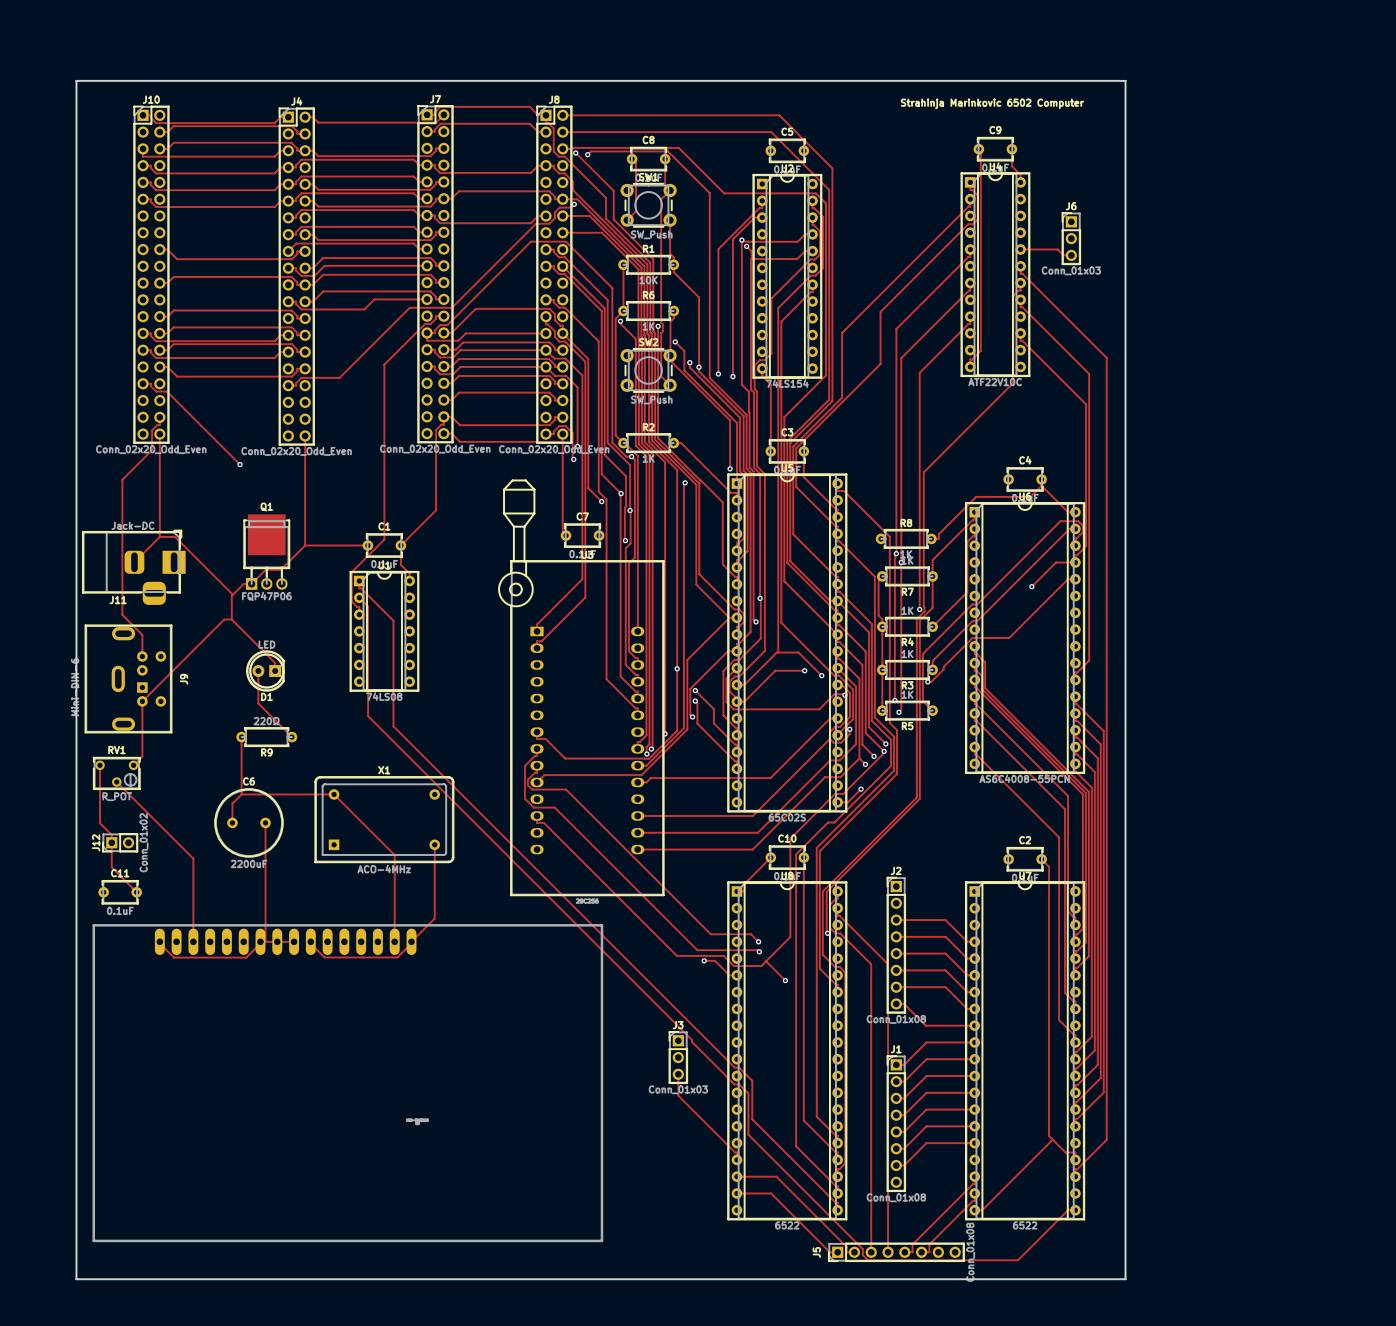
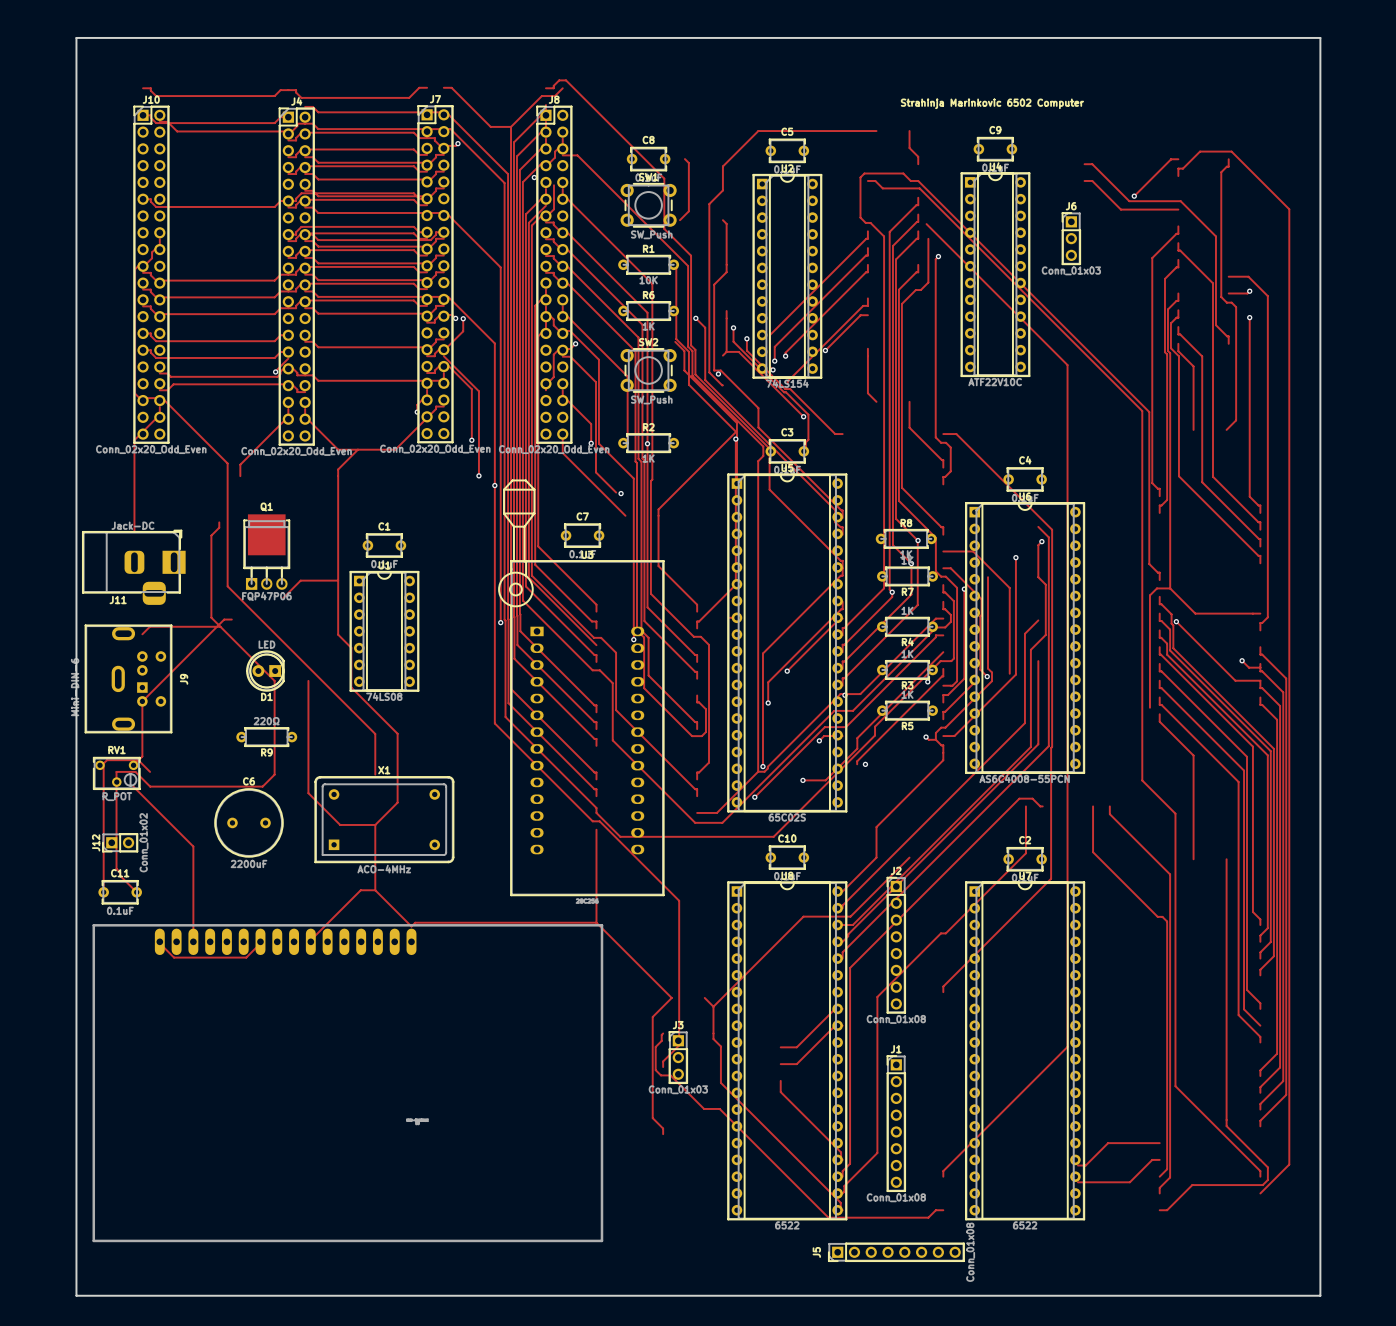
board edge: (76, 80) (1125, 80) (1125, 1279) (76, 1279) -> (76, 80) (76, 37) (1320, 37) (1320, 1295) (76, 1295) (76, 1279)
track: none -> (427, 87) (419, 87) (409, 97) (301, 97) (296, 90) (280, 90) (274, 96) (156, 96) (150, 88) (143, 88)
track: none -> (443, 87) (451, 87) (490, 126) (511, 126)
track: none -> (545, 88) (553, 88) (559, 80) (566, 80) (664, 178) (664, 228) (691, 255) (691, 345) (695, 349) (695, 374) (769, 448) (769, 489) (842, 560) (842, 575) (762, 653) (762, 766)
track: none -> (562, 88) (554, 96) (541, 96) (511, 126)
track: none -> (545, 105) (545, 112) (543, 112) (513, 142) (514, 658) (596, 738) (596, 745)
track: none -> (305, 106) (312, 106) (318, 112) (446, 112) (508, 174) (508, 703) (596, 789) (596, 796)
track: (427, 114) (434, 114) (440, 106) (529, 106) (538, 115) (545, 115) (545, 121) -> none
track: (443, 114) (436, 122) (318, 122) (312, 117) (305, 117) -> none
track: (562, 115) (779, 115) (832, 168) (832, 401) (790, 443) (790, 561) (830, 601) (837, 601) (868, 632) (868, 727) (885, 743) -> none
track: none -> (159, 121) (167, 121) (177, 131) (292, 131) (297, 123) (312, 123) (318, 129) (450, 129) (504, 183) (505, 717) (596, 808) (596, 812) (620, 836) (773, 836) (875, 735) (875, 726) (940, 661) (951, 661) (953, 658) (953, 601) (943, 592) (943, 585)
track: (545, 123) (553, 128) (553, 151) (558, 156) (564, 156) (606, 197) (606, 218) (650, 262) (652, 440) (696, 484) (696, 584) (729, 617) (687, 660) (687, 729) (641, 775) (544, 775) (537, 782) -> (545, 123) (545, 129) (543, 129) (516, 156) (517, 645) (596, 722) (596, 729)
track: none -> (511, 126) (511, 689) (596, 772) (596, 779)
track: (427, 131) (434, 131) (440, 123) (529, 123) (538, 132) (545, 132) -> none
track: none -> (876, 131) (758, 131) (722, 166) (722, 190) (709, 204) (709, 372) (722, 385)
track: (159, 132) (167, 132) (173, 126) (292, 126) (297, 133) (305, 133) -> none
track: (562, 132) (771, 132) (829, 189) (829, 399) (787, 441) (787, 562) (834, 610) (837, 610) (837, 625) (865, 651) (865, 732) (884, 753) (843, 793) (835, 793) (790, 838) (790, 937) (761, 966) (733, 966) (723, 955) (676, 955) (543, 822) (537, 822) (537, 816) -> none
track: none -> (545, 138) (545, 146) (543, 146) (519, 169) (520, 631) (596, 705) (596, 712)
track: none -> (562, 138) (562, 146) (554, 151) (554, 157) (549, 163) (541, 163) (522, 182) (522, 600) (592, 670) (599, 670) (612, 683) (612, 740) (695, 822) (722, 822) (834, 710) (852, 710) (936, 627) (945, 627) (950, 621) (950, 615) (943, 609) (943, 601)
track: none -> (288, 140) (296, 140) (301, 132) (413, 132) (419, 138) (434, 138) (440, 145) (455, 145) (457, 143)
via: none -> (457, 143)
track: (143, 148) (143, 156) (274, 156) (280, 150) (288, 150) -> none
track: (443, 148) (436, 148) (430, 156) (318, 156) (312, 150) (297, 150) (291, 142) (173, 142) (167, 148) (159, 148) -> none
track: (562, 148) (678, 147) (724, 193) (815, 193) (825, 203) (825, 375) (784, 417) (784, 581) (837, 634) (837, 642) (862, 664) (862, 744) (874, 756) -> none
track: (978, 149) (980, 151) (980, 350) (970, 359) (970, 366) -> none
track: (1011, 149) (1011, 166) (1020, 174) (1020, 182) -> (909, 131) (909, 148) (918, 156) (918, 164)
track: (575, 152) (613, 190) (613, 219) (653, 259) (655, 439) (699, 483) (699, 574) (734, 609) (739, 609) (744, 614) (744, 621) (736, 627) (736, 634) -> none
via: (575, 152) -> none
track: none -> (427, 154) (419, 154) (413, 149) (301, 149) (296, 157) (288, 157)
track: none -> (443, 154) (436, 154) (430, 162) (318, 162) (312, 157) (305, 157)
track: (587, 154) (590, 151) (668, 151) (709, 193) (709, 378) (746, 414) (746, 468) (750, 472) (750, 632) (736, 643) (736, 651) (727, 651) (690, 688) (690, 714) (692, 716) -> none
via: (587, 154) -> none
track: none -> (562, 155) (577, 155) (688, 265) (688, 346) (692, 351) (692, 375) (763, 446) (763, 456) (758, 461) (758, 771)
track: (632, 159) (636, 163) (636, 211) (627, 220) -> (684, 159) (688, 163) (688, 211) (679, 220)
track: (665, 159) (665, 185) (670, 190) (661, 199) (661, 322) (662, 324) (661, 376) (670, 385) -> none
track: none -> (1178, 159) (1170, 159) (1134, 196)
track: none -> (1228, 159) (1228, 166) (1221, 172) (1221, 297) (1226, 302) (1231, 302) (1236, 307) (1236, 420) (1226, 429)
track: none -> (1084, 164) (1092, 164) (1129, 201) (1180, 201) (1215, 236) (1215, 325) (1228, 336) (1228, 343)
track: (143, 165) (150, 165) (156, 173) (274, 173) (280, 167) (296, 167) (301, 159) (413, 159) (419, 165) (434, 165) (440, 172) (530, 172) (538, 165) (553, 165) (559, 173) (564, 173) (573, 181) (573, 190) (647, 264) (649, 441) (677, 470) (677, 730) (648, 758) (565, 758) (545, 739) (537, 739) (537, 732) -> none
track: none -> (427, 171) (419, 171) (413, 166) (301, 166) (296, 174) (288, 174)
track: none -> (443, 171) (436, 171) (430, 179) (318, 179) (312, 174) (305, 174)
track: none -> (1178, 176) (1178, 168) (1183, 168) (1200, 151) (1231, 151) (1289, 209) (1289, 1164) (1260, 1193)
via: none -> (534, 177)
track: none -> (867, 180) (875, 180) (882, 188) (919, 188) (1142, 411) (1142, 780) (1175, 813) (1175, 1086) (1260, 1171) (1260, 1176)
track: none -> (1084, 180) (1092, 180) (1120, 209) (1178, 209)
track: (427, 181) (419, 181) (413, 176) (301, 176) (296, 184) (280, 184) (274, 190) (156, 190) (150, 182) (143, 182) -> (427, 272) (419, 272) (413, 266) (301, 266) (296, 274) (280, 274) (274, 280) (156, 280) (150, 272) (143, 272)
track: (443, 181) (436, 181) (430, 189) (318, 189) (312, 184) (305, 184) -> none
track: (970, 182) (970, 189) (977, 195) (977, 219) (972, 224) (968, 224) (880, 311) (880, 363) (796, 448) (796, 486) (837, 526) (837, 541) (874, 576) (874, 717) (893, 736) (893, 770) (816, 847) (816, 1116) (837, 1135) (837, 1143) -> none
track: none -> (554, 185) (554, 209) (549, 213) (543, 213) (531, 225) (531, 575) (594, 637) (601, 637) (616, 652) (616, 710) (697, 789) (697, 796)
track: none -> (443, 188) (436, 188) (430, 196) (318, 196) (312, 190) (305, 190)
track: none -> (545, 188) (545, 196) (543, 196) (525, 214) (525, 586) (596, 655) (596, 661)
track: none -> (562, 188) (562, 196) (565, 196) (652, 283) (650, 593) (693, 636) (700, 636) (709, 644) (709, 762) (697, 772) (697, 779)
via: none -> (1134, 196)
track: none -> (918, 197) (918, 205) (889, 231) (889, 589) (892, 592) (892, 597) (842, 644) (842, 652)
track: (970, 199) (970, 206) (842, 332) (842, 397) (793, 446) (793, 534) (837, 576) (837, 591) (871, 624) (871, 720) (891, 739) (891, 765) (834, 822) (827, 822) (796, 854) (796, 1146) (837, 1186) (837, 1193) -> none
track: (762, 200) (762, 208) (759, 208) (718, 249) (718, 374) -> none
track: (812, 200) (812, 208) (822, 216) (822, 268) (815, 275) (810, 275) (778, 308) (778, 652) -> none
track: (305, 201) (312, 201) (318, 206) (430, 206) (436, 198) (451, 198) (459, 191) (549, 191) (554, 199) (577, 199) (644, 266) (644, 441) (665, 462) (665, 733) -> none
track: (574, 204) (570, 207) (559, 207) (554, 212) (554, 218) (549, 223) (536, 223) (451, 307) (409, 307) (339, 377) (301, 377) (296, 385) (288, 385) -> none
via: (574, 204) -> none
track: none -> (427, 205) (419, 205) (413, 199) (301, 199) (296, 207) (288, 207)
track: none -> (545, 205) (528, 222) (528, 577) (596, 645)
track: none -> (305, 207) (312, 207) (318, 212) (446, 212) (500, 267) (500, 622)
track: none -> (918, 214) (918, 221) (892, 245) (892, 545) (911, 563) (911, 594) (842, 661) (842, 668)
track: (545, 216) (538, 216) (530, 223) (440, 223) (434, 215) (419, 215) (413, 210) (301, 210) (296, 217) (288, 217) -> none
track: (562, 216) (589, 216) (641, 267) (641, 443) (652, 453) (651, 749) -> none
track: (762, 217) (754, 217) (732, 239) (732, 376) -> none
track: (812, 217) (812, 225) (820, 231) (820, 254) (814, 259) (810, 259) (771, 298) (771, 353) (764, 360) (759, 360) (754, 365) (754, 389) (756, 391) (756, 466) (764, 474) (764, 650) (739, 676) (734, 676) (729, 681) (729, 691) (736, 698) (736, 701) (744, 701) (775, 670) (804, 670) -> none
track: (670, 220) (670, 253) (673, 257) (673, 272) (699, 297) (699, 371) (743, 416) (743, 470) (747, 474) (747, 551) (736, 560) (736, 567) -> none
track: none -> (722, 220) (726, 223) (726, 272) (714, 284) (714, 370) (720, 370) (758, 408) (758, 427) (842, 510) (842, 517)
track: none -> (545, 222) (553, 222) (559, 230) (565, 230) (647, 312) (647, 607) (697, 655) (697, 661)
track: none -> (926, 224) (1067, 365) (1067, 1046) (943, 1171) (943, 1176)
track: none -> (1178, 226) (1178, 233) (1152, 258) (1152, 483) (1159, 488) (1159, 496)
track: none -> (867, 231) (867, 238) (769, 335) (769, 366) (773, 369)
track: none -> (918, 231) (918, 238) (895, 259) (895, 518) (917, 540) (917, 605) (842, 678) (842, 685)
track: (562, 232) (601, 232) (638, 269) (638, 444) (649, 455) (649, 744) (646, 747) (646, 754) -> none
track: (812, 234) (805, 234) (797, 241) (741, 241) -> none
track: none -> (427, 238) (419, 238) (413, 233) (301, 233) (296, 241) (288, 241)
track: none -> (443, 238) (436, 238) (430, 246) (318, 246) (312, 241) (305, 241)
track: none -> (928, 238) (928, 282) (920, 290) (915, 290) (901, 303) (901, 487) (943, 527) (943, 534)
track: none -> (159, 239) (159, 247) (152, 252) (152, 258) (145, 264) (139, 264) (135, 269) (135, 393) (139, 398) (162, 398) (227, 463) (227, 586) (375, 733) (375, 774)
track: none -> (545, 239) (553, 239) (559, 247) (564, 247) (642, 324) (644, 621) (697, 671) (697, 678)
track: (741, 240) (741, 384) (748, 391) (749, 467) (753, 471) (753, 619) (756, 621) -> none
via: (741, 240) -> none
track: none -> (1178, 243) (1178, 250) (1213, 283) (1213, 476) (1260, 522) (1260, 529)
track: (746, 246) (751, 251) (751, 259) -> none
via: (746, 246) -> none
track: none -> (867, 248) (867, 255) (774, 346) (774, 361)
track: (159, 249) (167, 249) (177, 259) (292, 259) (297, 251) (305, 251) -> none
track: (427, 249) (419, 249) (413, 243) (296, 243) (288, 251) -> none
track: (545, 249) (553, 249) (559, 257) (564, 257) (607, 300) (607, 442) (630, 465) (630, 543) (625, 548) (625, 664) (637, 674) (637, 681) -> none
track: (970, 249) (970, 256) (896, 328) (894, 700) -> none
track: (1020, 249) (1057, 249) (1063, 255) (1071, 255) -> none
track: (812, 251) (805, 251) (797, 259) (751, 259) -> none
track: none -> (427, 255) (419, 255) (413, 250) (301, 250) (296, 257) (288, 257)
track: none -> (443, 255) (436, 255) (430, 263) (318, 263) (312, 257) (305, 257)
track: none -> (545, 256) (553, 256) (559, 263) (564, 263) (638, 337) (638, 458) (641, 461) (641, 630) (648, 637) (648, 675) (697, 722) (697, 729)
track: none -> (938, 256) (935, 259) (935, 437) (950, 447) (950, 471) (943, 476) (943, 484)
via: none -> (938, 256)
track: (751, 259) (751, 389) (754, 392) (754, 467) (760, 473) (760, 638) (739, 659) (734, 659) (723, 671) (723, 715) (736, 727) (736, 735) -> none
track: none -> (1178, 259) (1178, 267) (1164, 278) (1167, 499) (1159, 505) (1159, 512)
track: (623, 264) (623, 311) (615, 318) (615, 435) (637, 456) (637, 631) -> none
track: none -> (676, 264) (676, 339) (688, 351) (688, 384) (736, 431) (685, 482)
track: none -> (867, 264) (867, 272) (785, 352) (785, 356)
track: none -> (918, 264) (918, 272) (898, 289) (898, 500) (935, 537) (935, 571) (941, 576) (945, 576) (957, 587) (957, 681) (952, 685) (943, 685)
track: (427, 265) (324, 265) (314, 275) (301, 275) (296, 268) (288, 268) -> none
track: (443, 265) (436, 265) (430, 258) (323, 258) (312, 268) (305, 268) -> none
track: (545, 266) (553, 266) (559, 274) (564, 274) (601, 311) (601, 474) (621, 493) (620, 676) (637, 691) (637, 698) -> none
track: (562, 266) (604, 308) (604, 454) (626, 476) (625, 540) -> none
track: (1020, 266) (1020, 273) (1106, 357) (1106, 1139) (1075, 1169) (1075, 1176) -> none
track: none -> (443, 272) (436, 272) (430, 280) (318, 280) (312, 274) (305, 274)
track: none -> (545, 272) (553, 272) (559, 280) (564, 280) (635, 351) (637, 630) (644, 637) (644, 688) (692, 736) (701, 736) (705, 732) (705, 709) (697, 702) (697, 695)
track: none -> (1228, 276) (1248, 276) (1267, 296) (1267, 617) (1260, 622) (1260, 630)
track: (443, 282) (436, 282) (430, 274) (323, 274) (312, 284) (297, 284) (291, 276) (173, 276) (167, 283) (159, 283) -> none
track: (970, 283) (970, 290) (901, 358) (901, 709) (898, 712) -> none
track: (1020, 283) (1020, 290) (1013, 296) (1013, 383) (923, 472) (924, 611) (916, 619) (916, 797) (822, 891) (822, 954) (834, 966) (839, 966) (845, 972) (845, 1163) (837, 1169) (837, 1176) -> none
track: (812, 284) (812, 292) (781, 321) (781, 622) (834, 675) (838, 675) (853, 689) (853, 719) (837, 735) -> none
track: none -> (427, 289) (419, 289) (413, 283) (301, 283) (296, 291) (280, 291) (274, 297) (156, 297) (150, 289) (143, 289)
track: none -> (545, 289) (545, 297) (535, 305) (535, 564) (591, 621) (596, 621) (596, 628)
track: none -> (305, 291) (312, 291) (318, 296) (448, 296) (494, 343) (494, 723) (592, 821) (599, 821) (679, 900) (679, 1045) (663, 1061) (663, 1067)
track: none -> (1249, 291) (1247, 293) (1228, 293)
via: none -> (1249, 291)
track: none -> (1178, 293) (1178, 300) (1167, 309) (1167, 350) (1170, 353) (1170, 588)
track: none -> (867, 298) (867, 305) (863, 305) (787, 381) (787, 384)
track: (427, 299) (374, 299) (364, 309) (301, 309) (296, 301) (288, 301) -> none
track: (443, 299) (436, 299) (430, 291) (323, 291) (312, 301) (305, 301) -> none
track: (545, 299) (553, 299) (559, 307) (564, 307) (598, 341) (598, 491) (606, 499) (606, 679) (637, 708) (637, 715) -> none
track: (1020, 299) (1020, 307) (1089, 373) (1089, 660) (1075, 672) (1075, 679) -> none
track: none -> (427, 305) (419, 305) (413, 300) (301, 300) (296, 308) (280, 308) (274, 314) (156, 314) (150, 306) (143, 306)
track: none -> (443, 305) (436, 305) (430, 313) (318, 313) (312, 308) (305, 308)
track: none -> (545, 306) (545, 314) (553, 319) (553, 325) (559, 330) (570, 330) (598, 359) (598, 443) (633, 478) (633, 639)
track: none -> (562, 306) (562, 314) (565, 314) (627, 376) (627, 443)
track: none -> (1178, 310) (1178, 317) (1170, 323) (1170, 348) (1178, 356) (1178, 476) (1260, 555) (1260, 563)
track: (673, 311) (673, 318) (670, 321) (670, 360) (730, 420) (730, 468) -> none
track: none -> (726, 311) (726, 351)
track: none -> (867, 315) (860, 315) (825, 350)
track: (159, 316) (167, 316) (173, 310) (291, 310) (297, 318) (305, 318) -> none
track: (443, 316) (436, 316) (430, 323) (425, 323) (384, 364) (384, 539) (351, 572) (351, 601) (359, 607) (359, 614) -> none
track: (970, 316) (970, 324) (919, 372) (919, 609) -> none
track: none -> (1249, 317) (1249, 496) (1260, 505) (1260, 512)
via: none -> (1249, 317)
track: none -> (455, 318) (452, 314) (440, 314) (434, 322) (427, 322)
via: none -> (455, 318)
track: none -> (463, 318) (463, 331) (446, 348) (440, 348) (434, 356) (427, 356)
via: none -> (463, 318)
track: none -> (695, 318) (705, 327) (705, 380) (835, 510) (835, 522) (842, 527) (842, 534)
via: none -> (695, 318)
track: (620, 321) (620, 323) (635, 339) (635, 445) (646, 456) (646, 735) (637, 741) (637, 748) -> none
via: (620, 321) -> none
track: (545, 324) (554, 331) (554, 337) (559, 341) (565, 341) (585, 361) (585, 597) (541, 641) (537, 641) (537, 648) -> (545, 324) (545, 330) (538, 336) (538, 546) (596, 604) (596, 611)
track: (658, 326) (658, 438) (722, 502) (722, 564) (736, 576) (736, 584) -> none
via: (658, 326) -> none
track: none -> (733, 327) (733, 341) (808, 414) (808, 439) (805, 442) (805, 449)
via: none -> (733, 327)
track: none -> (1178, 327) (1178, 334) (1202, 356) (1202, 482) (1260, 539) (1260, 546)
track: (443, 332) (451, 332) (475, 308) (549, 308) (554, 314) (554, 320) (562, 325) (562, 333) (588, 359) (588, 488) (601, 501) -> none
track: (159, 333) (167, 333) (173, 327) (291, 327) (297, 335) (305, 335) -> none
track: (545, 333) (465, 333) (458, 340) (427, 339) (427, 332) (434, 332) (440, 325) (447, 325) (530, 241) (565, 241) (612, 288) (612, 442) (626, 456) (631, 456) (634, 459) (634, 557) (628, 563) (628, 651) (637, 658) (637, 665) -> none
track: (1020, 333) (1020, 340) (1086, 404) (1086, 546) (1075, 555) (1075, 562) (1056, 562) (1031, 586) -> none
track: none -> (746, 338) (746, 350) (785, 389) (790, 389) (835, 434) (842, 434)
via: none -> (746, 338)
track: none -> (443, 339) (436, 339) (430, 347) (318, 347) (312, 341) (305, 341)
via: (675, 341) -> none
track: none -> (575, 343) (570, 348) (559, 348) (553, 354) (553, 377) (545, 382) (545, 390)
via: none -> (575, 343)
track: none -> (1178, 343) (1178, 351) (1193, 366) (1193, 429)
track: none -> (867, 348) (867, 393) (876, 401)
track: (427, 349) (434, 349) (440, 357) (453, 357) (460, 350) (545, 350) (554, 358) (565, 358) (582, 375) (582, 579) (537, 624) (537, 631) -> none
track: (443, 349) (455, 349) (463, 342) (549, 342) (554, 350) (562, 350) -> none
track: (159, 350) (167, 350) (173, 344) (291, 344) (297, 352) (305, 352) -> none
via: none -> (825, 350)
track: none -> (726, 351) (722, 355)
track: none -> (726, 351) (738, 351) (803, 416)
track: none -> (443, 356) (478, 391) (478, 475)
track: none -> (562, 356) (570, 356) (595, 382) (595, 472) (616, 492)
via: none -> (785, 356)
track: none -> (288, 358) (275, 371)
via: none -> (774, 361)
track: (689, 362) (689, 367) (739, 417) (739, 471) (744, 475) (744, 537) (736, 543) (736, 550) -> none
via: (689, 362) -> none
track: (427, 366) (434, 366) (440, 374) (453, 374) (460, 367) (545, 367) (554, 376) (566, 376) (577, 387) (577, 446) -> none
track: (443, 366) (451, 366) (459, 359) (549, 359) (554, 367) (562, 367) -> none
track: (159, 367) (167, 367) (177, 376) (292, 376) (297, 368) (305, 368) -> none
via: (699, 367) -> none
track: (762, 368) (762, 376) (770, 384) (770, 451) -> none
via: none -> (773, 369)
via: none -> (275, 371)
track: none -> (427, 373) (434, 373) (440, 364) (447, 364) (471, 389) (471, 440)
track: none -> (443, 373) (443, 380) (318, 380) (312, 375) (297, 375) (291, 367) (284, 367) (277, 376) (170, 376) (167, 373) (159, 373)
via: (732, 376) -> none
track: (143, 383) (150, 383) (156, 391) (166, 391) (240, 464) -> none
track: (443, 383) (451, 383) (458, 376) (549, 376) (554, 383) (562, 383) -> none
track: none -> (427, 389) (427, 397) (417, 404) (417, 412)
track: none -> (159, 390) (167, 390) (173, 384) (292, 384) (297, 392) (305, 392)
track: none -> (562, 390) (562, 398) (565, 398) (591, 424) (591, 443)
track: (443, 400) (451, 400) (459, 392) (549, 392) (554, 400) (562, 400) -> none
track: none -> (443, 406) (436, 406) (436, 408) (395, 449) (338, 449) (305, 416) (305, 408)
track: none -> (159, 407) (159, 414) (134, 440) (134, 531)
track: none -> (288, 408) (288, 416) (240, 464) (240, 476)
via: none -> (417, 412)
via: none -> (803, 416)
track: (159, 417) (159, 425) (152, 430) (152, 450) (122, 479) (122, 614) (142, 634) (142, 656) -> none
track: (562, 417) (554, 417) (549, 425) (459, 425) (451, 416) (443, 416) (443, 424) (436, 429) (436, 510) (400, 545) (400, 564) (409, 573) (409, 581) -> none
track: (443, 433) (451, 433) (459, 441) (562, 441) -> none
track: (159, 434) (159, 536) -> none
track: (545, 434) (553, 434) (559, 426) (565, 426) (572, 433) (573, 459) -> none
track: none -> (943, 434) (956, 434) (1052, 529) (1051, 878) (943, 986) (943, 992)
track: (305, 435) (305, 545) -> none
track: none -> (735, 439) (735, 584) (697, 621) (697, 628)
via: none -> (471, 440)
via: none -> (591, 443)
track: (673, 443) (681, 443) (731, 492) (736, 492) (736, 500) -> none
via: (577, 446) -> none
track: none -> (357, 449) (338, 469) (338, 634) (351, 647) (351, 687) (397, 733) (397, 802) (375, 824)
track: (803, 451) (803, 477) (837, 509) (837, 517) -> (909, 401) (909, 427) (943, 460) (943, 467)
track: (562, 453) (562, 532) (566, 535) -> (562, 453) (625, 515)
via position: (631, 456) -> (647, 443)
via: (573, 459) -> none
via: (240, 464) -> none
via position: (730, 468) -> (735, 439)
via: none -> (478, 475)
via: (685, 482) -> none
track: (837, 483) (837, 491) (844, 491) (889, 536) (889, 722) (896, 730) (896, 774) (819, 851) (819, 968) (837, 984) (837, 992) -> none
track: (683, 484) (683, 728) (646, 765) (637, 765) -> (683, 484) (658, 509) (658, 566) (697, 604) (697, 611)
via: none -> (494, 485)
track: (1041, 485) (1030, 496) (976, 496) (938, 534) (938, 538) (931, 538) -> none
track: (1041, 485) (1067, 512) (1075, 512) -> none
via: (601, 501) -> none
via: (630, 510) -> none
track: (974, 512) (974, 519) (932, 560) (932, 607) (919, 620) (919, 798) (826, 891) (827, 933) -> none
track: none -> (1038, 526) (1048, 537) (1048, 746) (842, 952) (842, 958)
track: (974, 528) (974, 536) (967, 541) (967, 592) (932, 626) -> none
track: (1075, 528) (1067, 528) (977, 621) (972, 621) (932, 660) (932, 669) -> none
track: (159, 536) (175, 536) (232, 594) -> none
track: (159, 536) (134, 562) -> none
via: (625, 540) -> none
via: none -> (918, 540)
track: none -> (1041, 541) (1038, 545) (1038, 577) (1045, 584) (1045, 634) (1030, 649) (1030, 746) (852, 925) (842, 925)
via: none -> (1041, 541)
track: (305, 545) (367, 545) -> none
track: (305, 545) (280, 569) (265, 569) (251, 583) (243, 583) (231, 595) (231, 619) (275, 662) (275, 671) -> none
track: (1075, 545) (1075, 538) (1083, 532) (1083, 525) (1078, 521) (1060, 521) (977, 604) (972, 604) (922, 653) (922, 700) (932, 710) -> none
track: none -> (943, 551) (973, 551) (1009, 588) (1009, 673)
via: (896, 553) -> none
track: none -> (1015, 557) (1015, 674) (954, 736) (943, 736)
via: none -> (1015, 557)
via: (901, 562) -> none
via: none -> (911, 563)
track: none -> (943, 568) (950, 568) (981, 599) (980, 669) (987, 676)
track: (882, 576) (878, 576) (878, 615) (882, 619) (882, 710) -> none
track: none -> (988, 577) (988, 668) (992, 672) (992, 681) (945, 727) (941, 727) (935, 732) (935, 739)
track: (1075, 579) (1067, 579) (1009, 637) (972, 637) (931, 681) (927, 681) -> none
track: none -> (338, 580) (300, 580) (283, 597)
track: none -> (1159, 580) (1159, 572) (1149, 564) (1149, 412) (918, 180) (910, 180) (903, 173) (864, 173) (860, 177) (860, 217) (865, 222) (870, 222) (884, 236) (884, 588) (842, 627) (842, 635)
track: (359, 581) (359, 588) (393, 620) (393, 726) (734, 1067) (739, 1067) (752, 1080) (752, 1119) (837, 1202) (837, 1210) -> none
via: (1031, 586) -> none
track: none -> (1170, 588) (1195, 613) (1260, 613)
track: none -> (1170, 588) (1156, 588) (1149, 595) (1149, 707)
track: none -> (964, 589) (964, 678) (947, 695) (943, 695) (943, 702)
via: none -> (964, 589)
via: none -> (892, 592)
track: none -> (1159, 596) (1159, 604) (1171, 614) (1173, 648) (1273, 748) (1273, 956) (1260, 969) (1260, 975)
track: (359, 597) (368, 606) (368, 716) (734, 1084) (739, 1084) (748, 1093) (748, 1134) (862, 1249) (862, 1255) (867, 1260) (1017, 1260) (1067, 1210) (1075, 1210) -> none
via: (760, 598) -> none
track: none -> (842, 601) (842, 609) (768, 682) (768, 703)
via: (919, 609) -> none
track: none -> (976, 613) (976, 680) (943, 711) (943, 719)
track: none -> (1159, 613) (1159, 621) (1170, 629) (1170, 650) (1270, 751) (1270, 942) (1260, 952) (1260, 958)
track: none -> (842, 618) (839, 618) (787, 671)
track: none -> (943, 618) (935, 618) (860, 694) (840, 694) (764, 771) (758, 771)
track: none -> (1038, 620) (1024, 633) (1024, 723) (842, 905) (842, 908)
via: (756, 621) -> none
track: none -> (1176, 621) (1235, 680) (1260, 680) (1260, 688) (1280, 705) (1280, 1067) (1260, 1087) (1260, 1092)
via: none -> (1176, 621)
via: none -> (500, 622)
track: none -> (220, 626) (149, 626) (142, 634)
track: none -> (1159, 630) (1159, 637) (1167, 643) (1167, 654) (1267, 755) (1267, 928) (1260, 935) (1260, 941)
track: none -> (943, 635) (935, 635) (845, 727) (824, 727) (754, 797)
via: none -> (633, 639)
track: (974, 646) (974, 653) (985, 662) (985, 688) (1088, 791) (1088, 956) (1075, 967) (1075, 975) -> none
track: none -> (1159, 647) (1159, 654) (1252, 746) (1252, 912) (1260, 919) (1260, 925)
track: none -> (1260, 647) (1260, 654) (1286, 678) (1286, 1094) (1260, 1120) (1260, 1126)
track: (837, 651) (837, 658) (859, 678) (859, 758) -> none
track: none -> (943, 652) (857, 738) (857, 748) (825, 780) (802, 780)
track: none -> (1242, 660) (1248, 667) (1260, 667)
via: none -> (1242, 660)
track: none -> (1038, 661) (1038, 744) (842, 941)
track: (974, 663) (974, 670) (982, 676) (982, 689) (1085, 793) (1085, 942) (1075, 951) (1075, 958) -> none
track: none -> (1159, 663) (1159, 671) (1246, 756) (1246, 989) (1260, 1003) (1260, 1008)
track: none -> (1260, 663) (1260, 671) (1283, 692) (1283, 1081) (1260, 1104) (1260, 1109)
via: (677, 668) -> none
track: (736, 668) (726, 678) (726, 702) (733, 709) (819, 709) (834, 694) (844, 695) -> none
track: (837, 668) (856, 686) (856, 744) (839, 760) (830, 760) (757, 832) (637, 832) -> none
track: none -> (943, 668) (943, 676) (857, 761) (857, 764)
via: (804, 670) -> none
track: (258, 671) (258, 703) (291, 737) -> none
via: none -> (787, 671)
track: (821, 675) (798, 652) (776, 652) (744, 684) (736, 684) -> none
via: (821, 675) -> none
via: none -> (987, 676)
track: (974, 679) (974, 687) (1082, 794) (1082, 928) (1075, 934) (1075, 941) -> none
track: none -> (308, 680) (308, 793) (340, 824) (375, 824)
track: none -> (1159, 680) (1159, 688) (1244, 770) (1244, 1009) (1260, 1025)
track: (837, 684) (841, 684) (849, 692) (849, 716) (840, 726) (835, 726) (829, 732) (829, 739) -> none
track: (695, 690) (713, 709) (713, 723) (736, 744) (736, 752) -> none
via: (695, 690) -> none
track: (974, 696) (974, 704) (1067, 796) (1067, 911) (1075, 917) (1075, 925) -> none
track: (1075, 696) (1075, 704) (1103, 731) (1103, 1092) (1075, 1118) (1075, 1126) -> none
track: none -> (1159, 697) (1159, 704) (1238, 781) (1238, 1015) (1260, 1036) (1260, 1042)
track: none -> (1260, 697) (1260, 704) (1277, 719) (1277, 1053) (1260, 1070) (1260, 1076)
via: (894, 700) -> none
track: (695, 701) (697, 703) (697, 723) (736, 761) (736, 768) -> none
via: (695, 701) -> none
via: none -> (768, 703)
via: (898, 712) -> none
track: (974, 713) (974, 720) (1065, 809) (1065, 992) (1075, 1001) (1075, 1008) -> none
track: (1075, 713) (1075, 720) (1100, 744) (1100, 1078) (1075, 1102) (1075, 1109) -> none
track: none -> (1159, 714) (1159, 721) (1193, 755) (1193, 859)
via: (692, 716) -> none
track: (837, 718) (830, 718) (770, 778) (650, 778) (646, 782) (637, 782) -> none
track: (849, 729) (849, 734) (841, 742) (833, 742) (829, 739) -> none
via: (849, 729) -> none
track: (1075, 730) (1075, 737) (1097, 758) (1097, 1064) (1075, 1085) (1075, 1092) -> none
via: (665, 733) -> none
track: none -> (842, 736) (824, 736) (819, 740)
track: (241, 737) (241, 794) -> none
track: none -> (926, 737) (928, 739) (935, 739)
via: none -> (926, 737)
track: (829, 739) (752, 816) (637, 816) -> none
track: none -> (935, 739) (943, 745) (943, 760) (876, 827) (876, 857) (842, 891)
via: none -> (819, 740)
via: (885, 743) -> none
track: (974, 747) (974, 754) (1059, 837) (1059, 1020) (1075, 1035) (1075, 1042) -> none
track: (1075, 747) (1075, 754) (1094, 772) (1094, 1050) (1075, 1068) (1075, 1076) -> none
track: (537, 748) (537, 755) (524, 765) (524, 798) (533, 807) (554, 807) (697, 950) (757, 950) (759, 951) -> none
via: (651, 749) -> none
via: (884, 751) -> none
via: (646, 754) -> none
via: (874, 756) -> none
track: (859, 758) (840, 777) (825, 777) (752, 849) (637, 849) -> none
track: (859, 758) (865, 764) -> none
track: (1075, 763) (1075, 771) (1091, 787) (1091, 1036) (1075, 1051) (1075, 1059) -> none
track: (100, 765) (100, 823) (111, 834) (111, 867) (120, 875) -> (219, 522) (219, 527) (211, 535) (211, 617) (274, 680) (274, 774) (262, 786) (150, 786) (135, 771) (116, 771) (116, 868) (120, 872) (120, 875)
track: (537, 765) (537, 772) (527, 779) (527, 785) (532, 789) (566, 789) (710, 934) (751, 934) (758, 941) -> none
via: none -> (762, 766)
track: none -> (150, 771) (138, 760) (106, 760) (103, 763) (103, 892)
track: none -> (758, 771) (716, 812) (697, 812)
via: none -> (802, 780)
track: (116, 782) (193, 858) -> (133, 786) (193, 846) (193, 858)
track: (861, 789) (847, 802) (837, 802) -> none
via: (861, 789) -> none
track: (241, 794) (232, 803) (232, 822) -> none
track: (241, 794) (334, 794) (394, 855) (394, 941) -> none
via: none -> (754, 797)
track: none -> (1025, 806) (1025, 853) (945, 933) (940, 933) (877, 996) (877, 1153) (844, 1186) (842, 1193)
track: none -> (1042, 806) (1032, 798) (1019, 798) (850, 967) (850, 1163) (842, 1171) (842, 1176)
track: none -> (1093, 806) (1093, 852) (1157, 916) (1162, 916) (1167, 921) (1167, 1169) (1159, 1176)
track: none -> (1109, 806) (1109, 814) (1170, 874) (1170, 1177) (1159, 1187) (1159, 1193)
track: (265, 822) (265, 941) -> none
track: none -> (375, 824) (375, 890)
track: none -> (596, 829) (596, 922)
track: (434, 844) (434, 918) (397, 957) (324, 957) (310, 941) -> (375, 890) (360, 890) (310, 941)
track: (770, 857) (744, 884) (744, 891) (736, 891) -> none
track: (803, 857) (803, 1120) (837, 1152) (837, 1159) -> none
track: none -> (909, 857) (850, 916) (803, 916) (713, 1006)
track: (1041, 859) (1049, 866) (1049, 1135) (1052, 1139) -> none
track: none -> (1226, 859) (1226, 1126) (1267, 1167) (1267, 1180) (1262, 1185) (1192, 1185) (1167, 1210) (1159, 1210)
track: none -> (375, 890) (411, 926) (415, 922) (596, 922)
track: (837, 891) (837, 898) (830, 904) (830, 927) (835, 933) (840, 933) (871, 964) (871, 1252) -> none
track: (837, 908) (837, 915) (888, 964) (888, 1252) -> none
track: (896, 920) (945, 920) (967, 941) (974, 941) -> none
track: none -> (596, 922) (671, 997) (652, 1016) (652, 1118) (663, 1128) (663, 1134)
via: (827, 933) -> none
track: (896, 936) (945, 936) (967, 958) (974, 958) -> none
track: (260, 941) (294, 941) -> none
via: (758, 941) -> none
via: (759, 951) -> none
track: (896, 953) (945, 953) (967, 975) (974, 975) -> none
track: (704, 960) (715, 960) (729, 975) (736, 975) -> none
via: (704, 960) -> none
track: (766, 961) (785, 980) -> none
track: (896, 970) (945, 970) (967, 992) (974, 992) -> none
via: (785, 980) -> none
track: (896, 987) (945, 987) (967, 1008) (974, 1008) -> none
track: none -> (704, 997) (713, 1006)
track: (896, 1003) (904, 1003) (925, 1025) (974, 1025) -> none
track: none -> (713, 1006) (713, 1039) (720, 1046) (720, 1082) (840, 1202) (842, 1210)
track: none -> (842, 1008) (835, 1008) (796, 1047) (780, 1047)
track: none -> (842, 1025) (835, 1025) (796, 1064) (780, 1064)
track: none -> (663, 1033) (661, 1040) (655, 1046) (655, 1070) (660, 1075) (670, 1075) (704, 1108) (719, 1108) (828, 1217) (928, 1217) (935, 1210) (943, 1210)
track: (974, 1042) (926, 1042) (904, 1064) (896, 1064) -> none
track: (974, 1059) (926, 1059) (904, 1081) (896, 1081) -> none
track: (678, 1074) (678, 1095) (736, 1152) (736, 1159) -> none
track: (974, 1076) (926, 1076) (904, 1098) (896, 1098) -> none
track: none -> (780, 1080) (780, 1092) (841, 1152) (842, 1159)
track: (974, 1092) (926, 1092) (904, 1115) (896, 1115) -> none
track: (974, 1109) (926, 1109) (904, 1131) (896, 1131) -> none
track: (974, 1126) (926, 1126) (904, 1148) (896, 1148) -> none
track: (1052, 1139) (982, 1210) (974, 1210) -> none
track: (1052, 1139) (1065, 1152) (1075, 1152) (1075, 1159) -> none
track: (974, 1143) (926, 1143) (904, 1165) (896, 1165) -> none
track: none -> (1159, 1143) (1108, 1143) (1085, 1165) (1077, 1165)
track: none -> (1159, 1159) (1152, 1159) (1129, 1182) (1077, 1182)
track: (736, 1176) (776, 1176) (846, 1246) (846, 1252) (854, 1252) -> none
track: (974, 1176) (974, 1184) (912, 1244) (912, 1252) (904, 1252) -> none
track: (736, 1193) (771, 1193) (829, 1252) (837, 1252) -> none
track: (974, 1193) (974, 1200) (929, 1244) (929, 1252) (921, 1252) -> none

